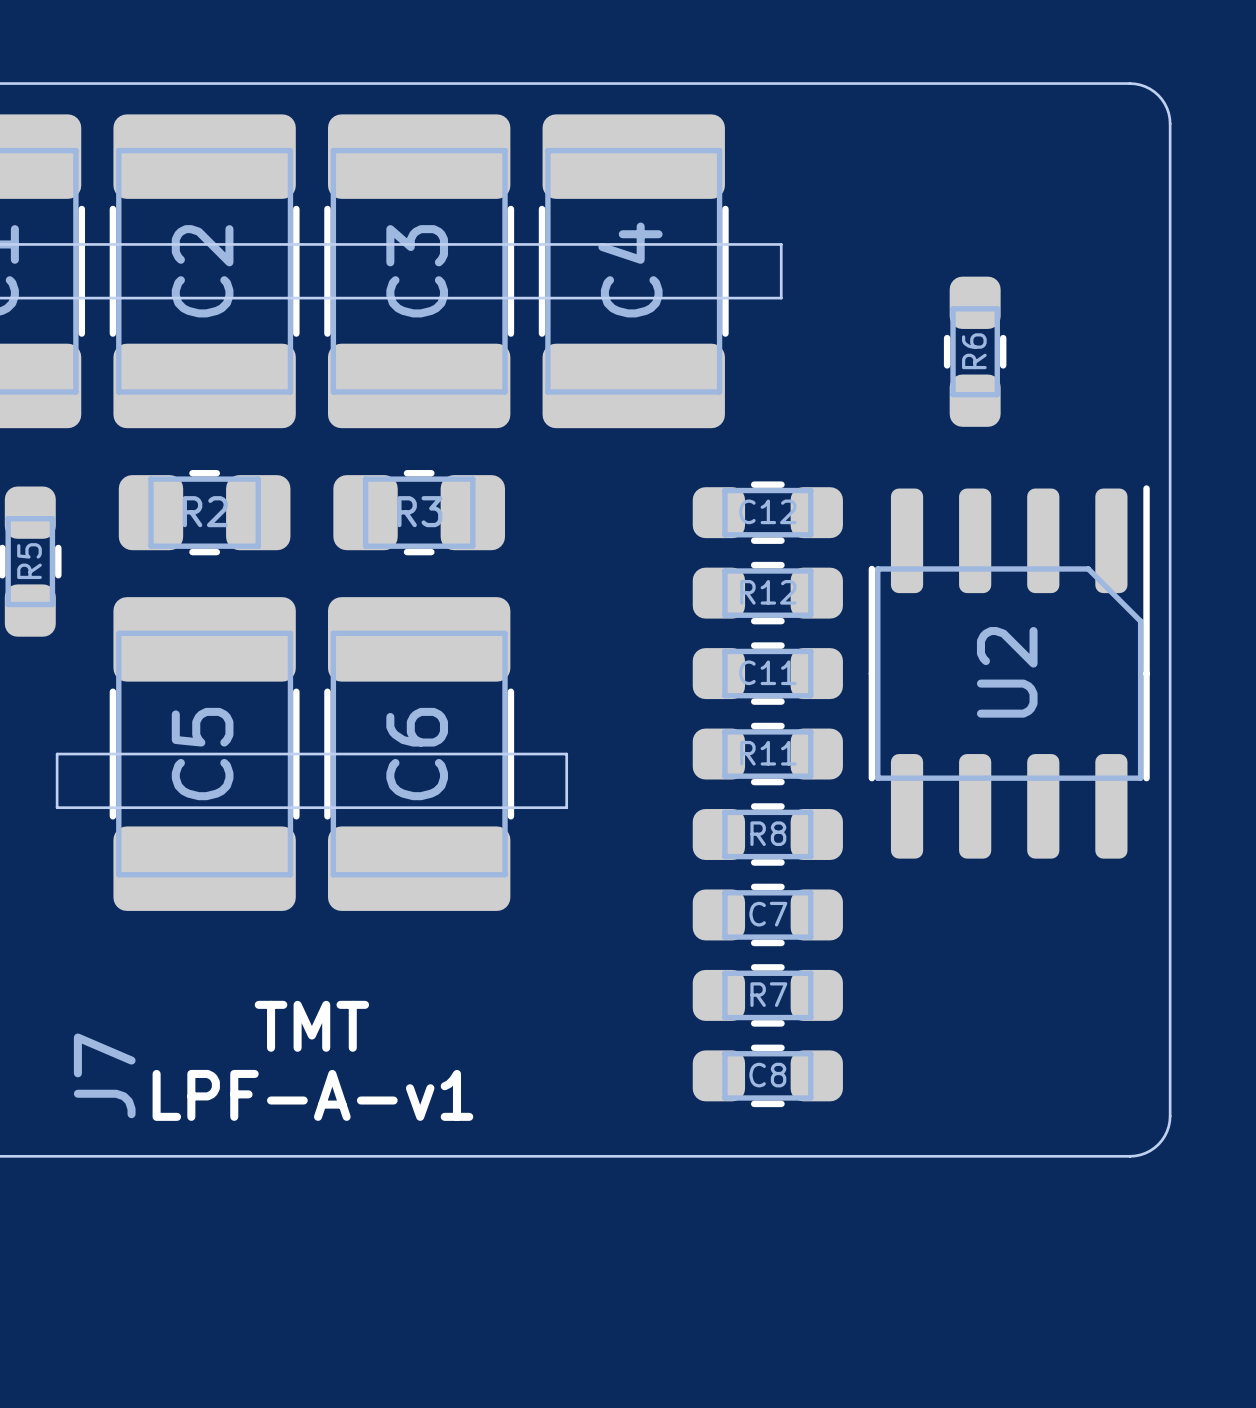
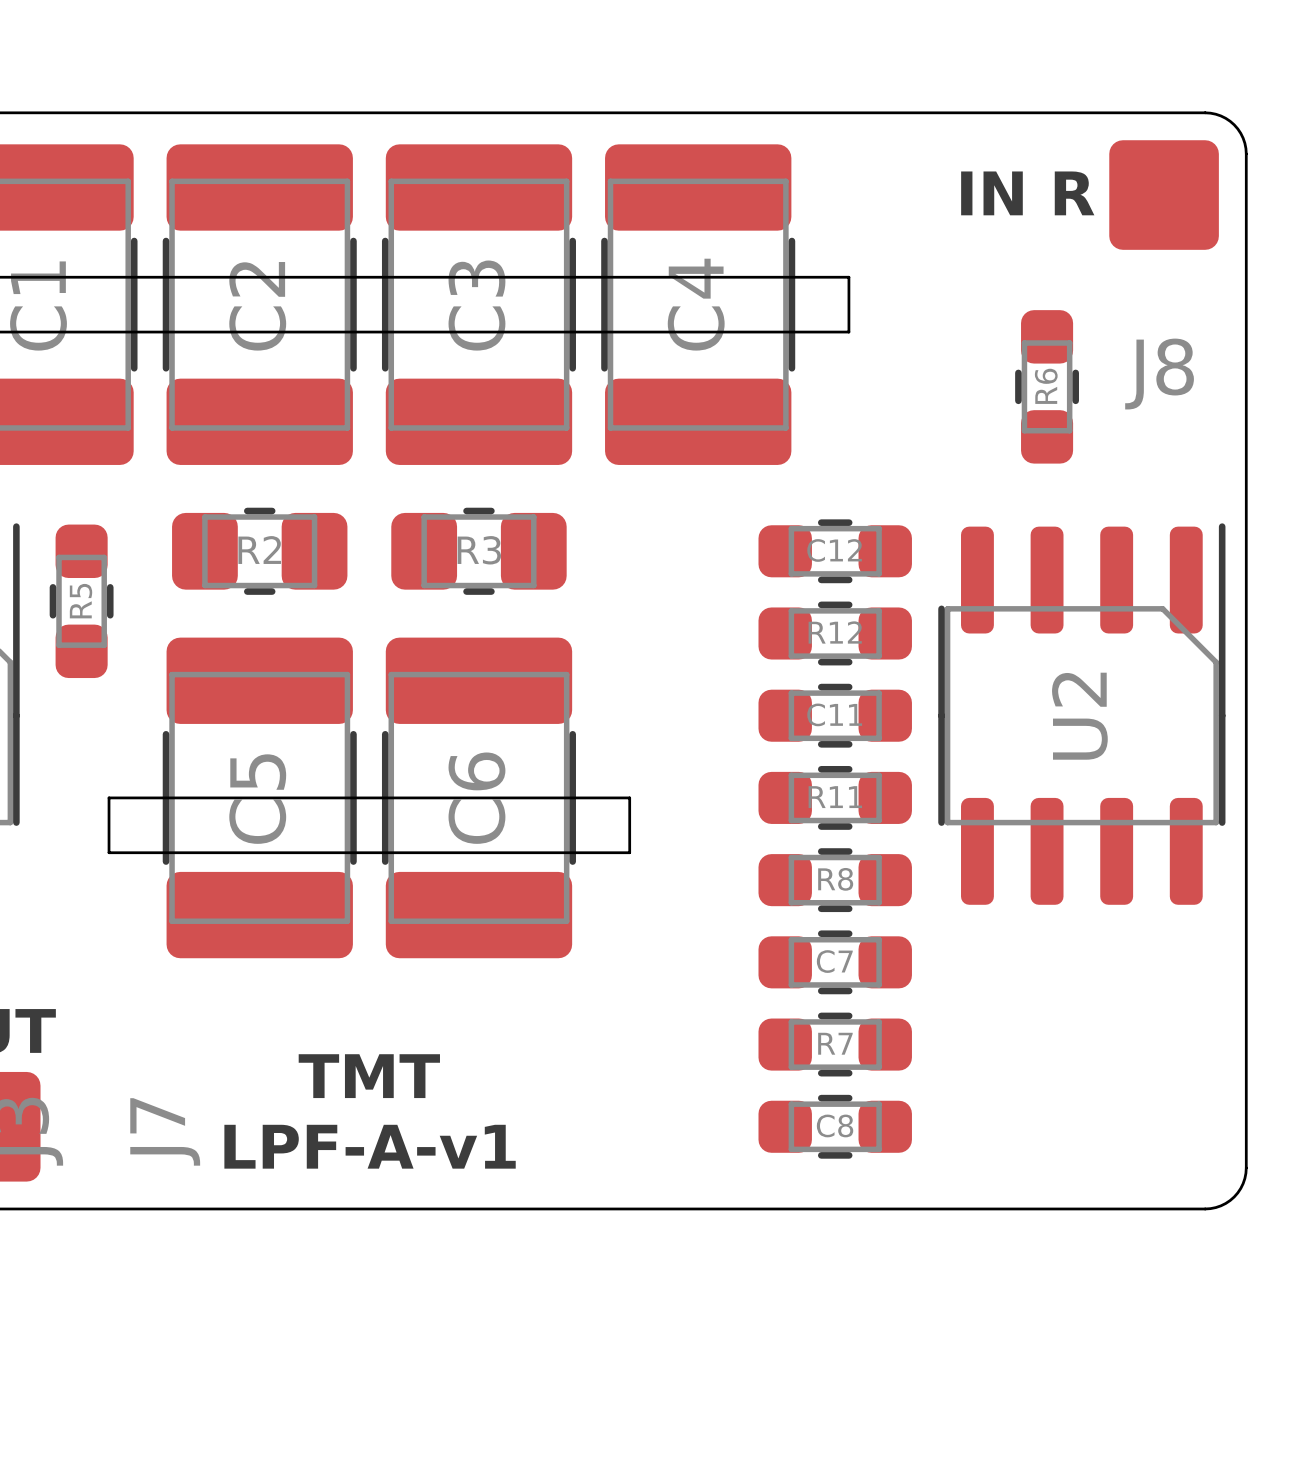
text: none -> IN R (1027, 193)
J8: none -> (1164, 195)

